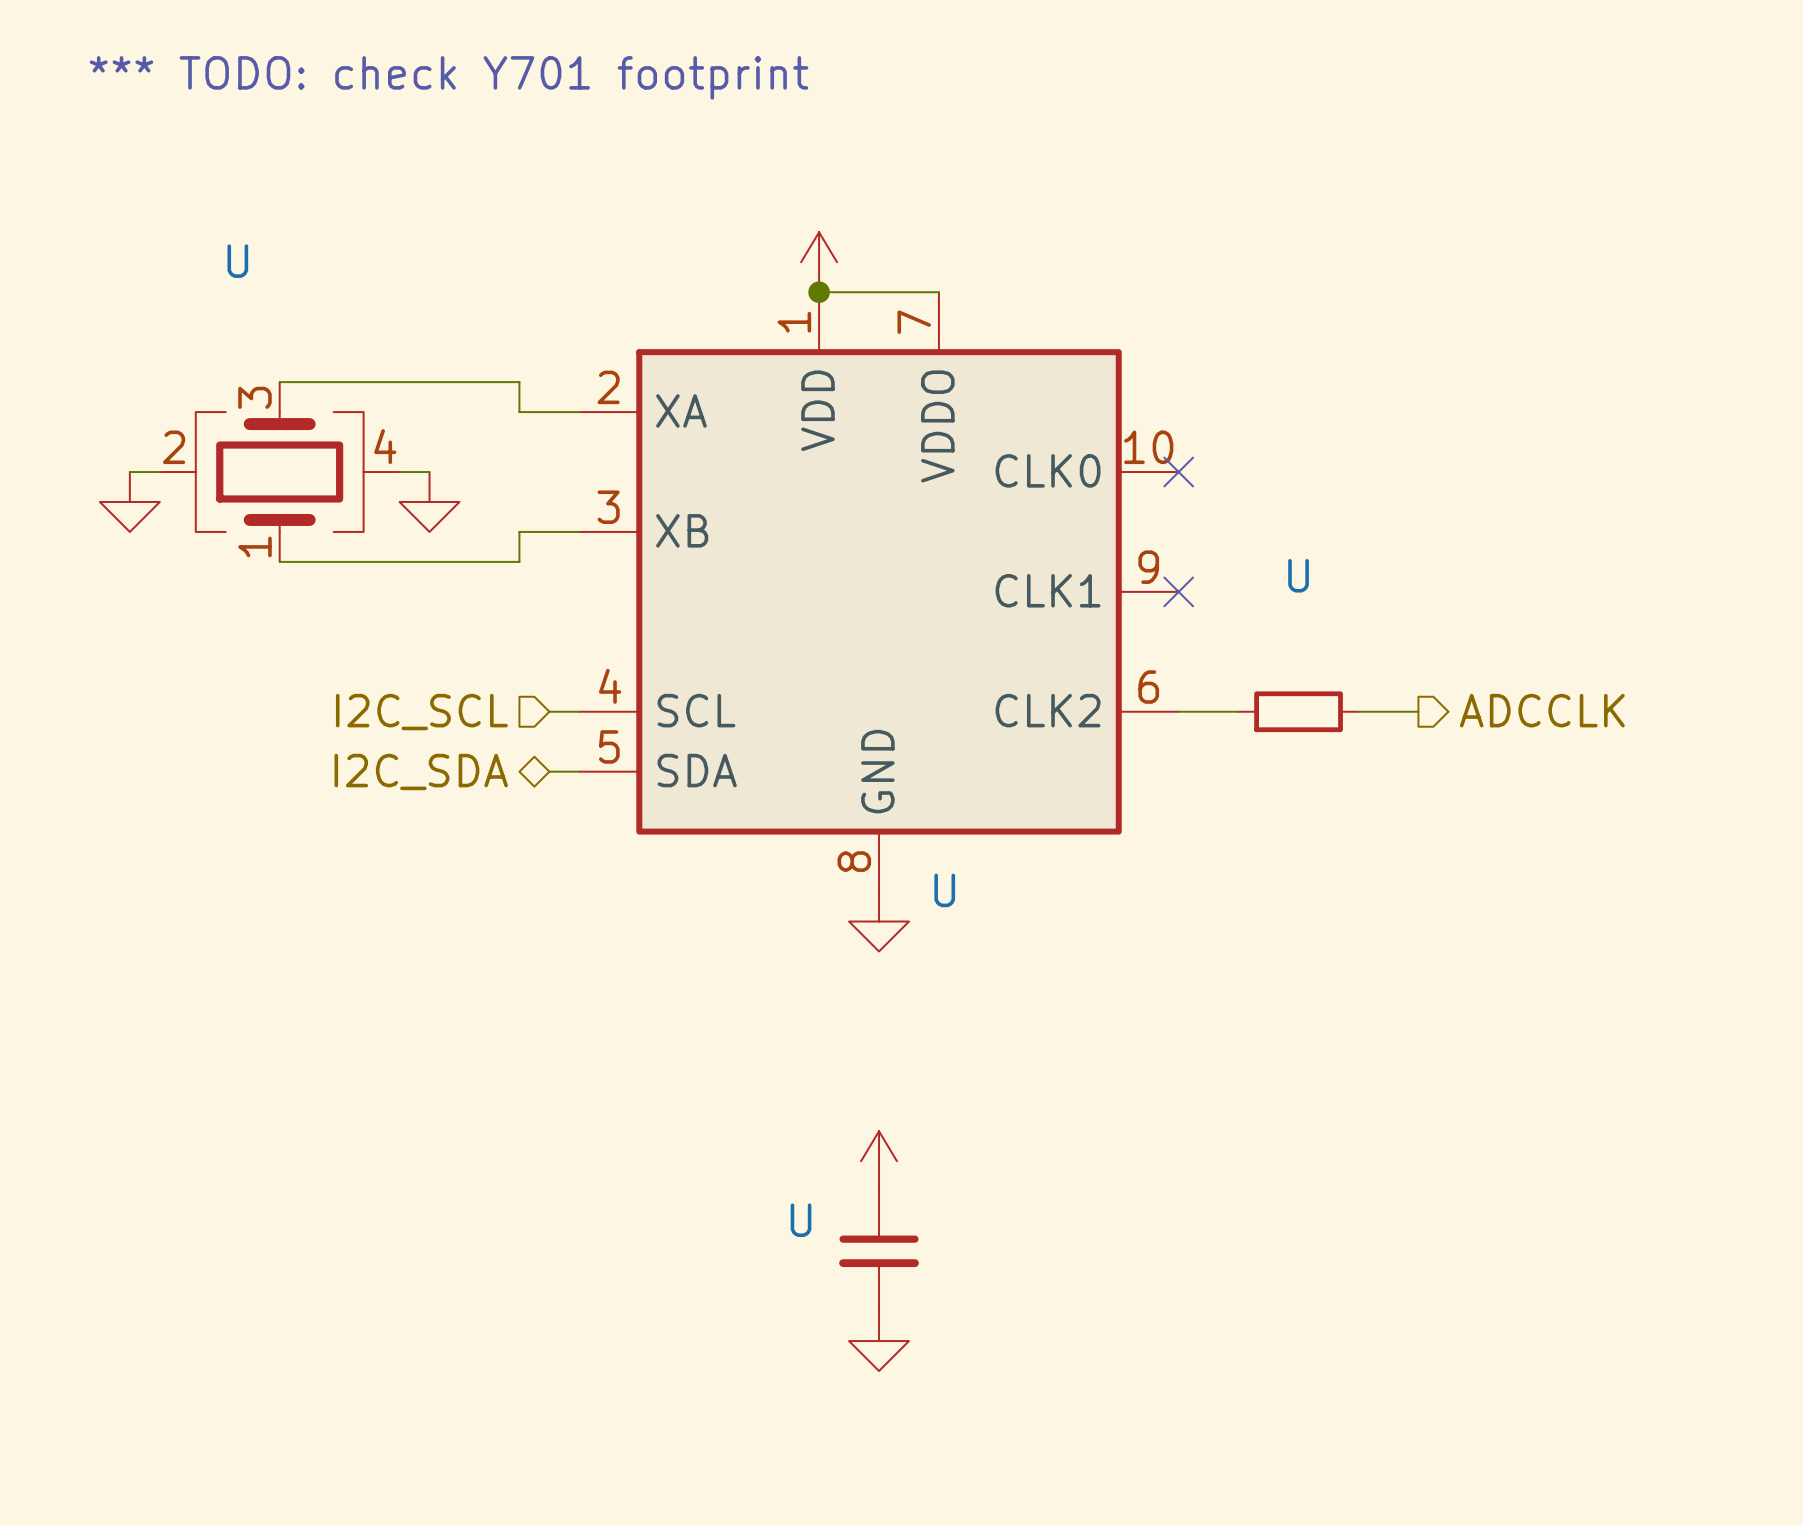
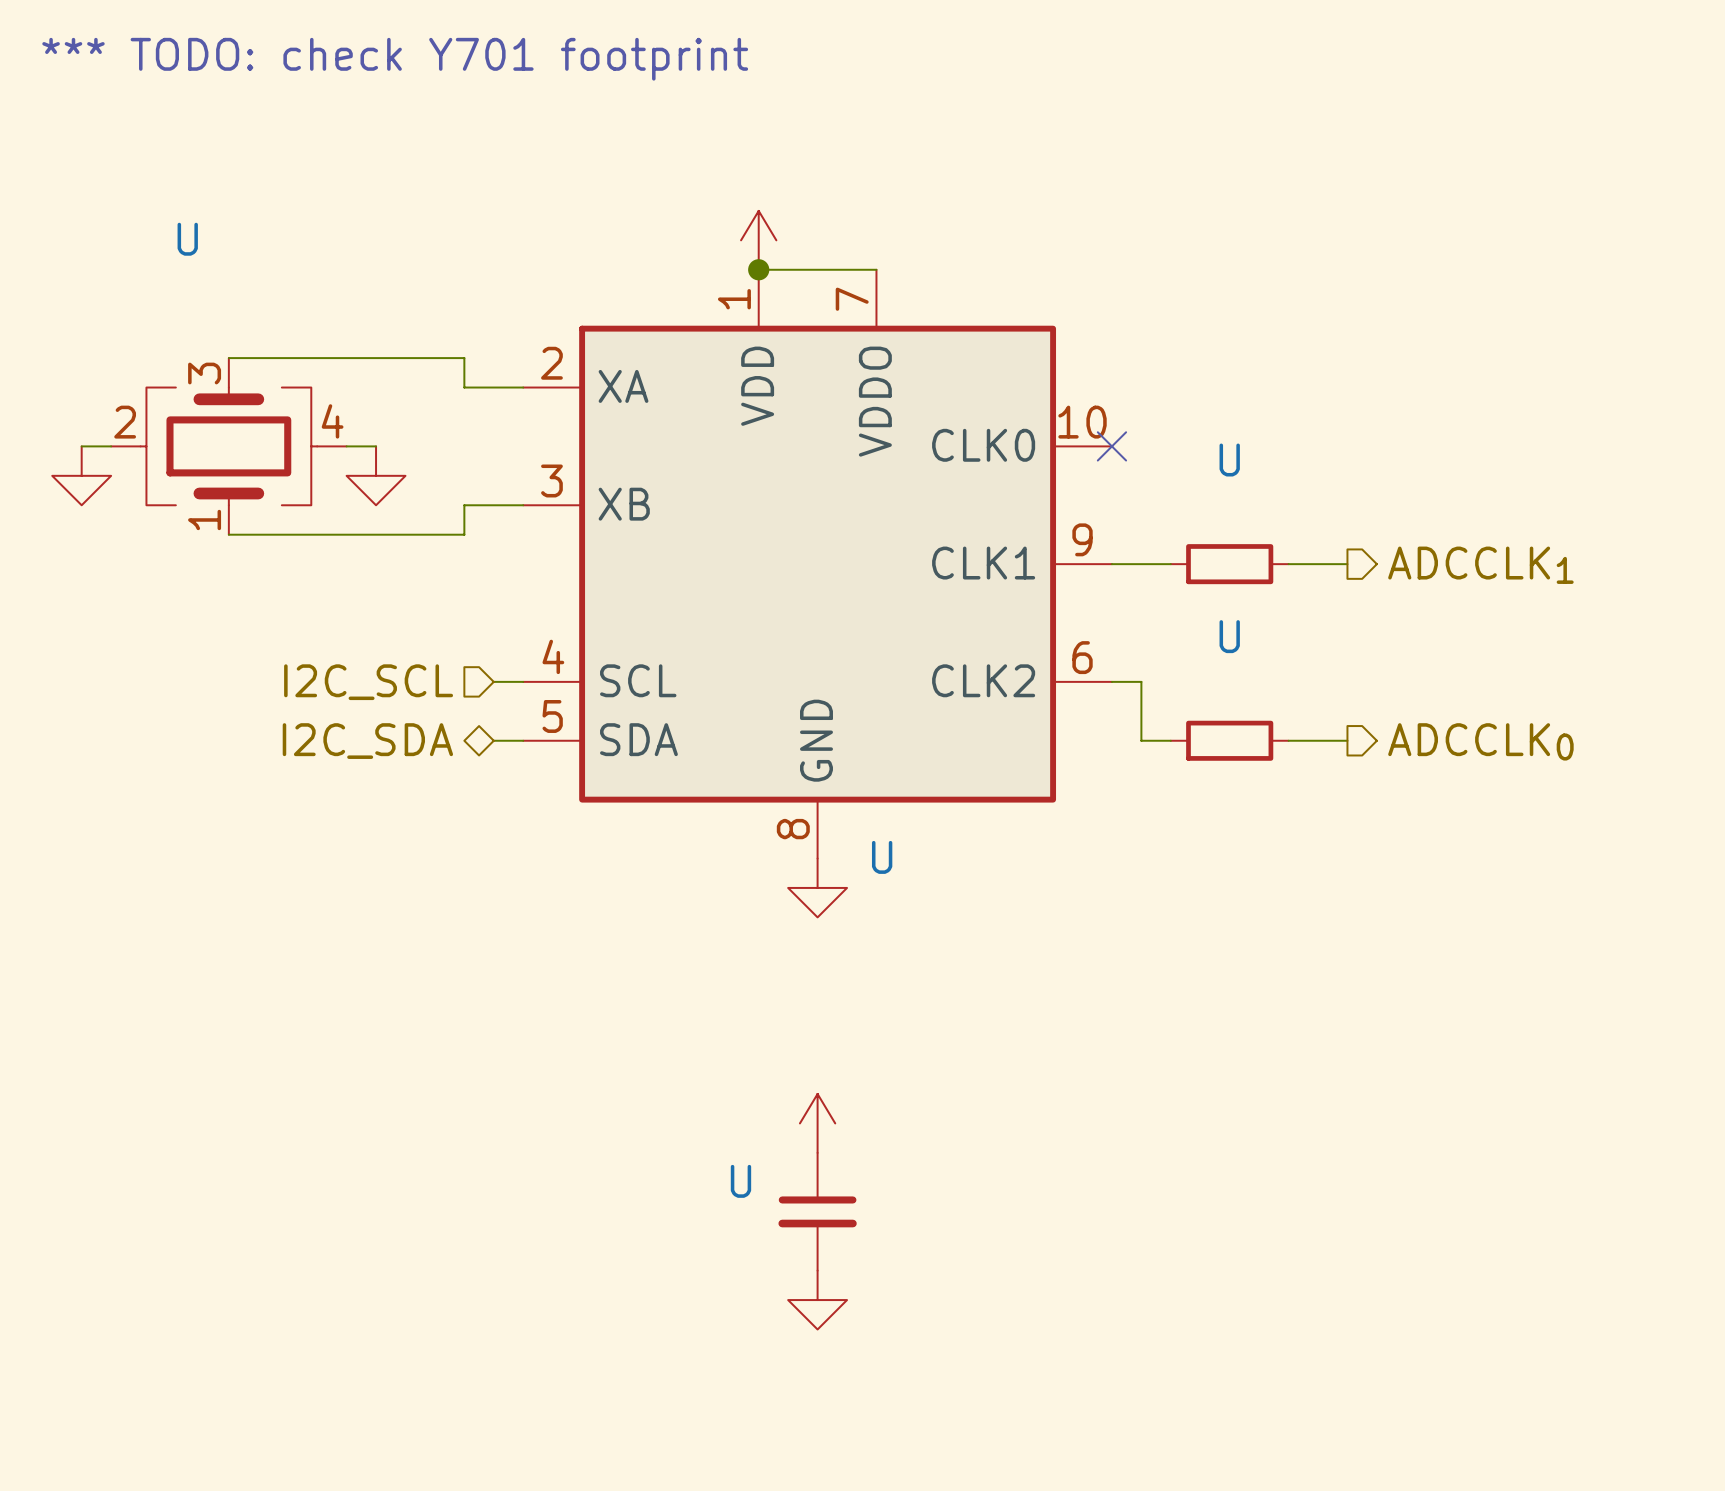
wire: none -> (1111, 564) (1170, 564)
no-connect mark: (1178, 591) -> none
U: none -> (1229, 564)
wire: none -> (1288, 564) (1347, 564)
hierarchical label: none -> ADCCLK1 (1480, 565)
hierarchical label: ADCCLK (1542, 710) -> ADCCLK0 (1480, 741)
wire: (1208, 711) (1238, 711) -> (1141, 681) (1141, 740) (1170, 740)
U: (1298, 711) -> none
wire: (1358, 711) (1418, 711) -> (1288, 740) (1347, 740)
U: none -> (1229, 740)

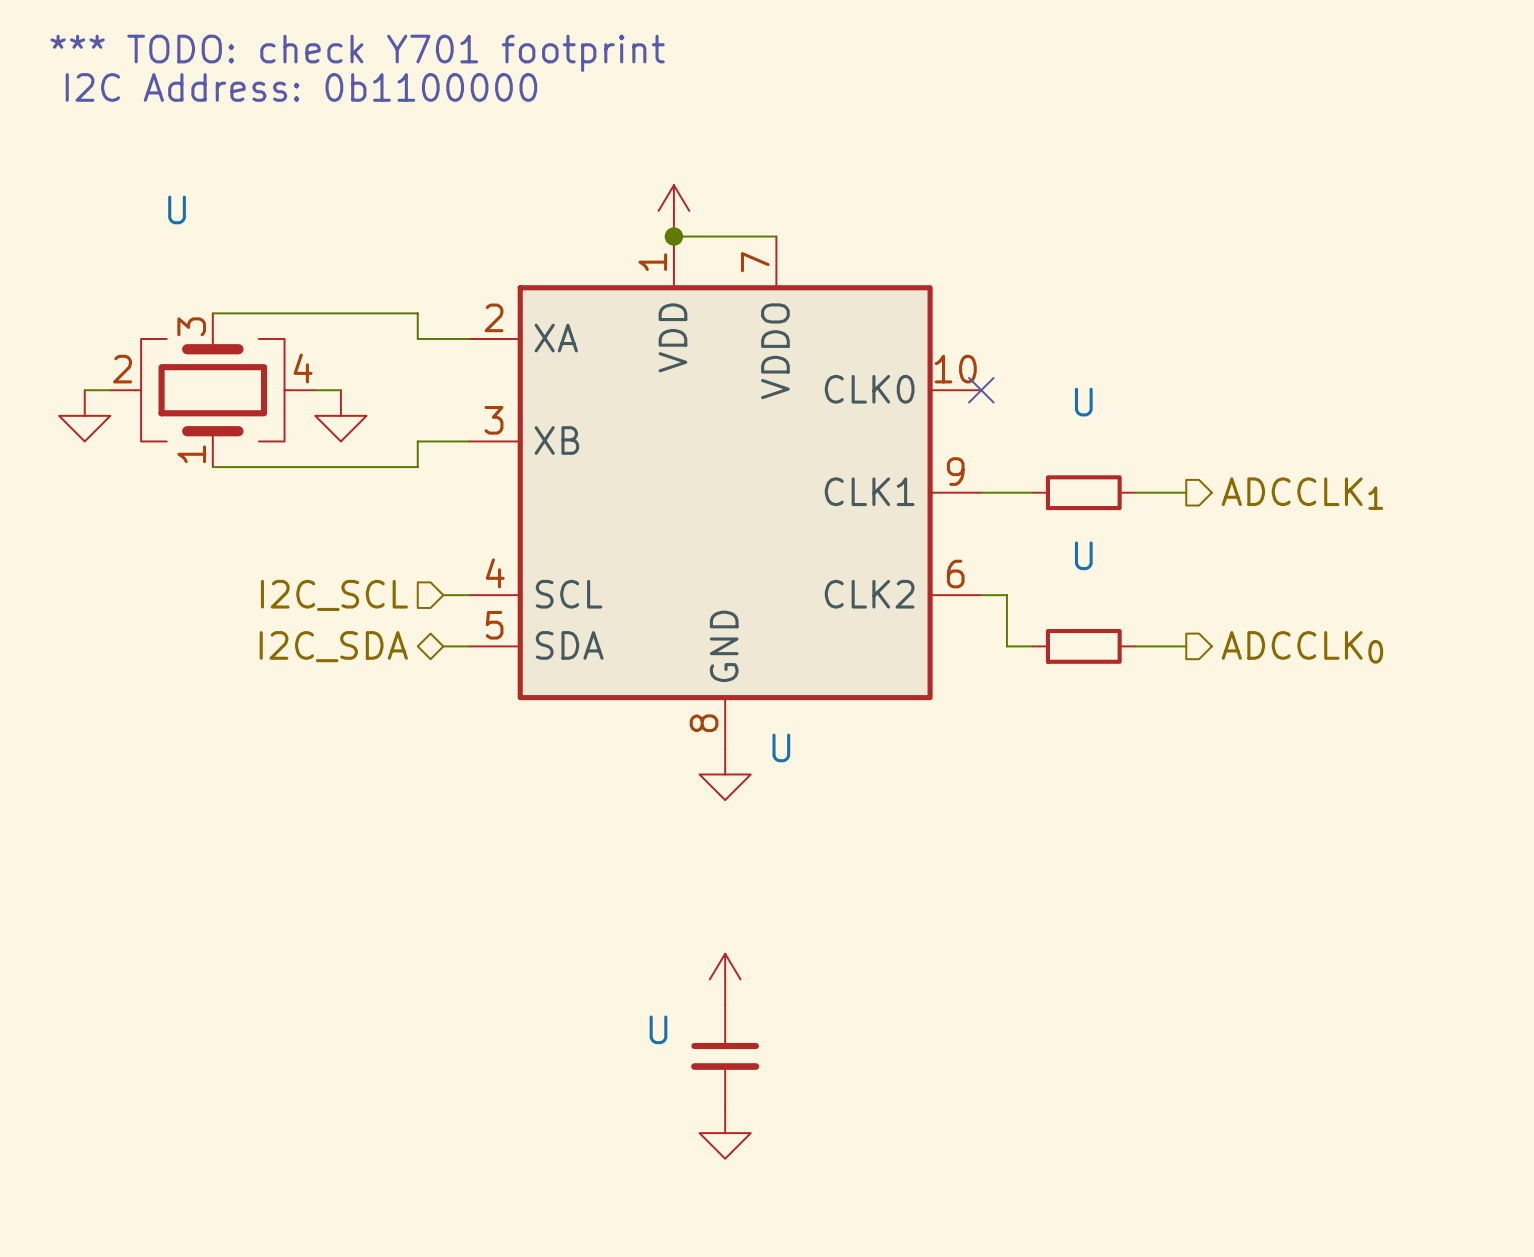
text: none -> I2C Address: 0b1100000 (301, 87)

